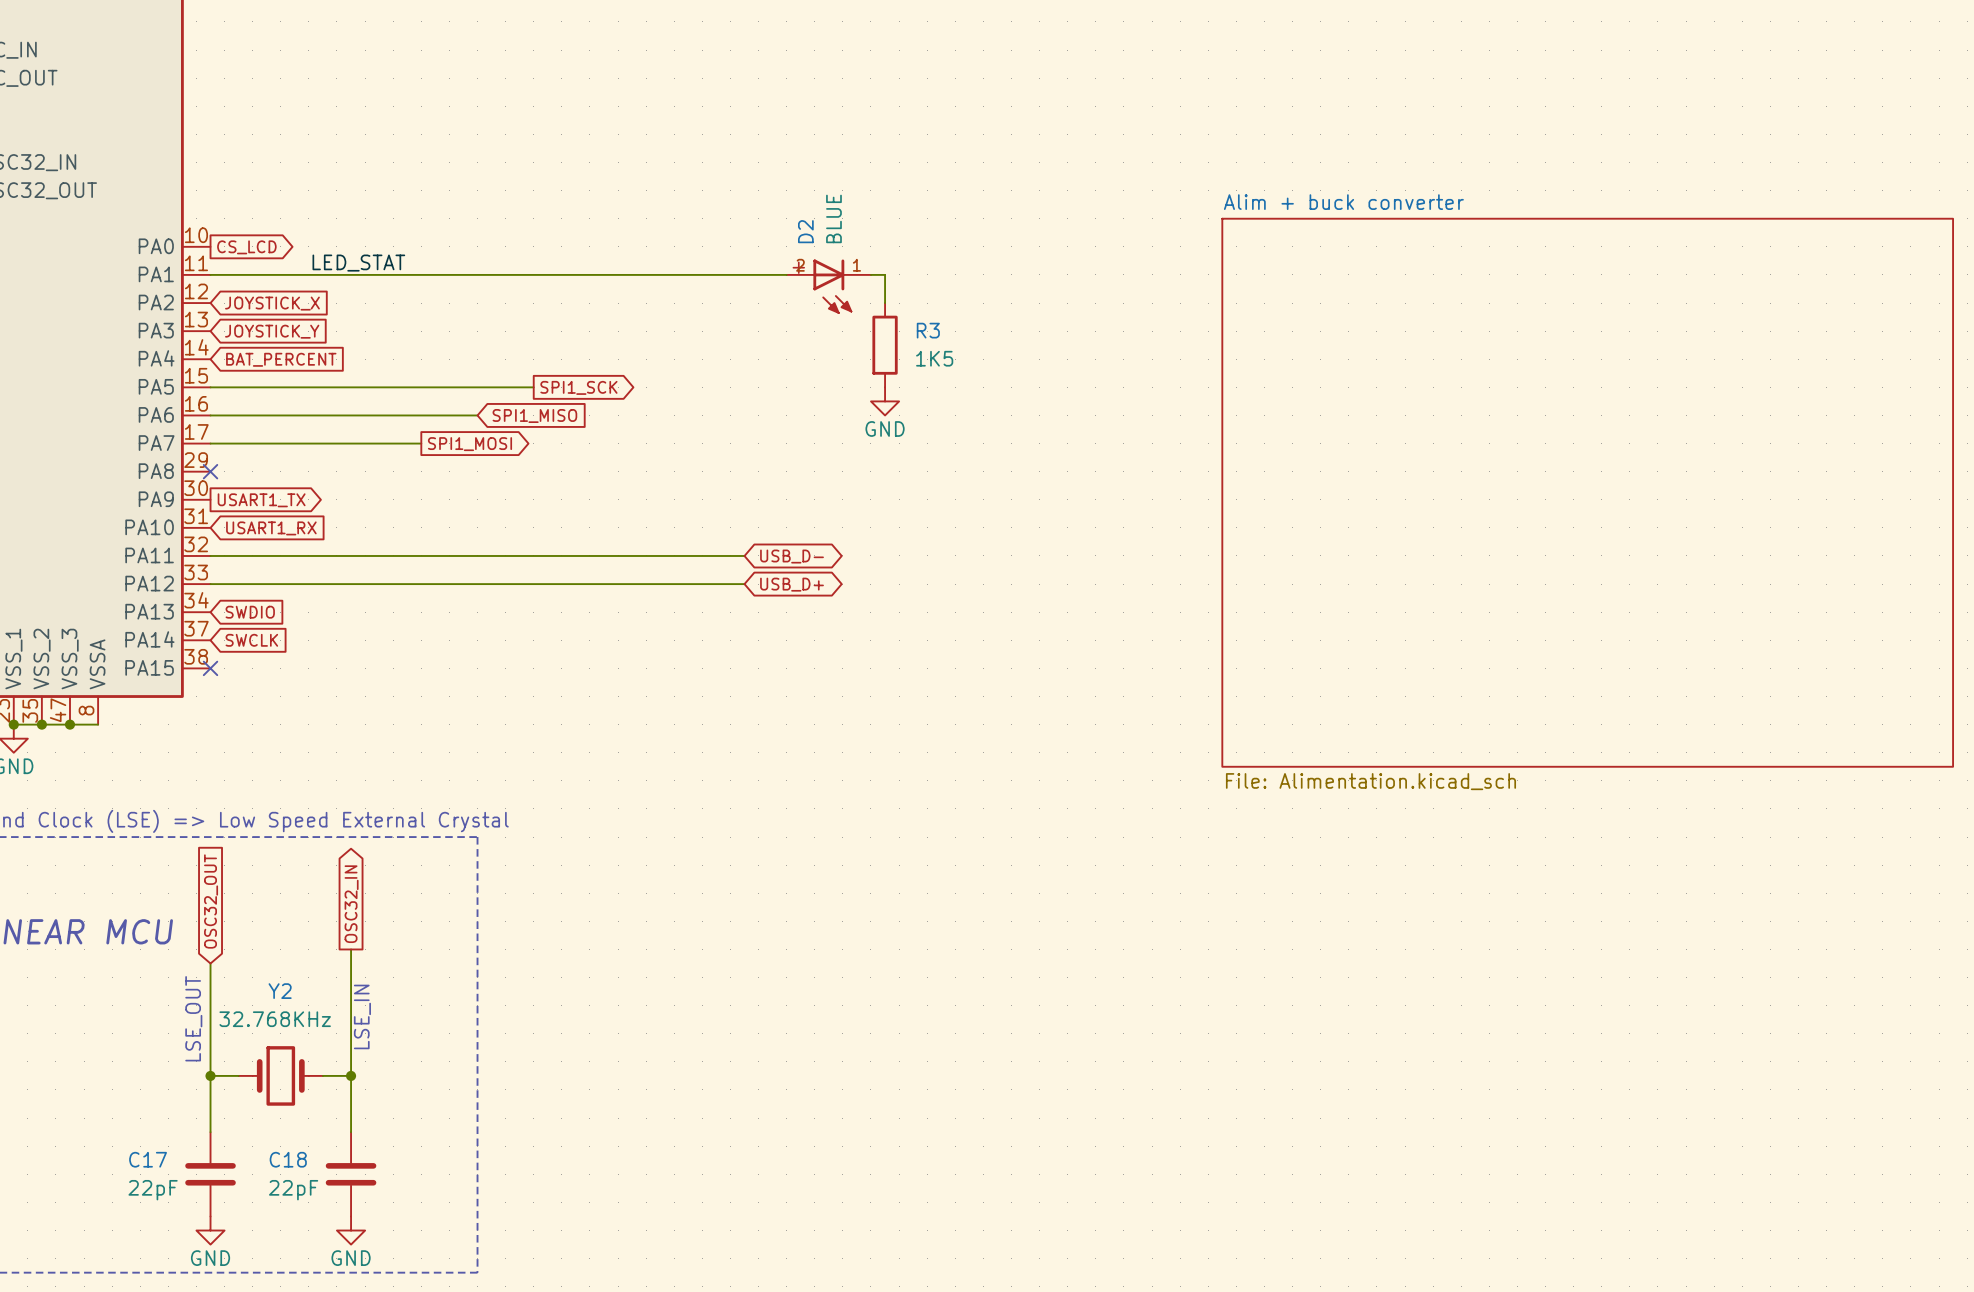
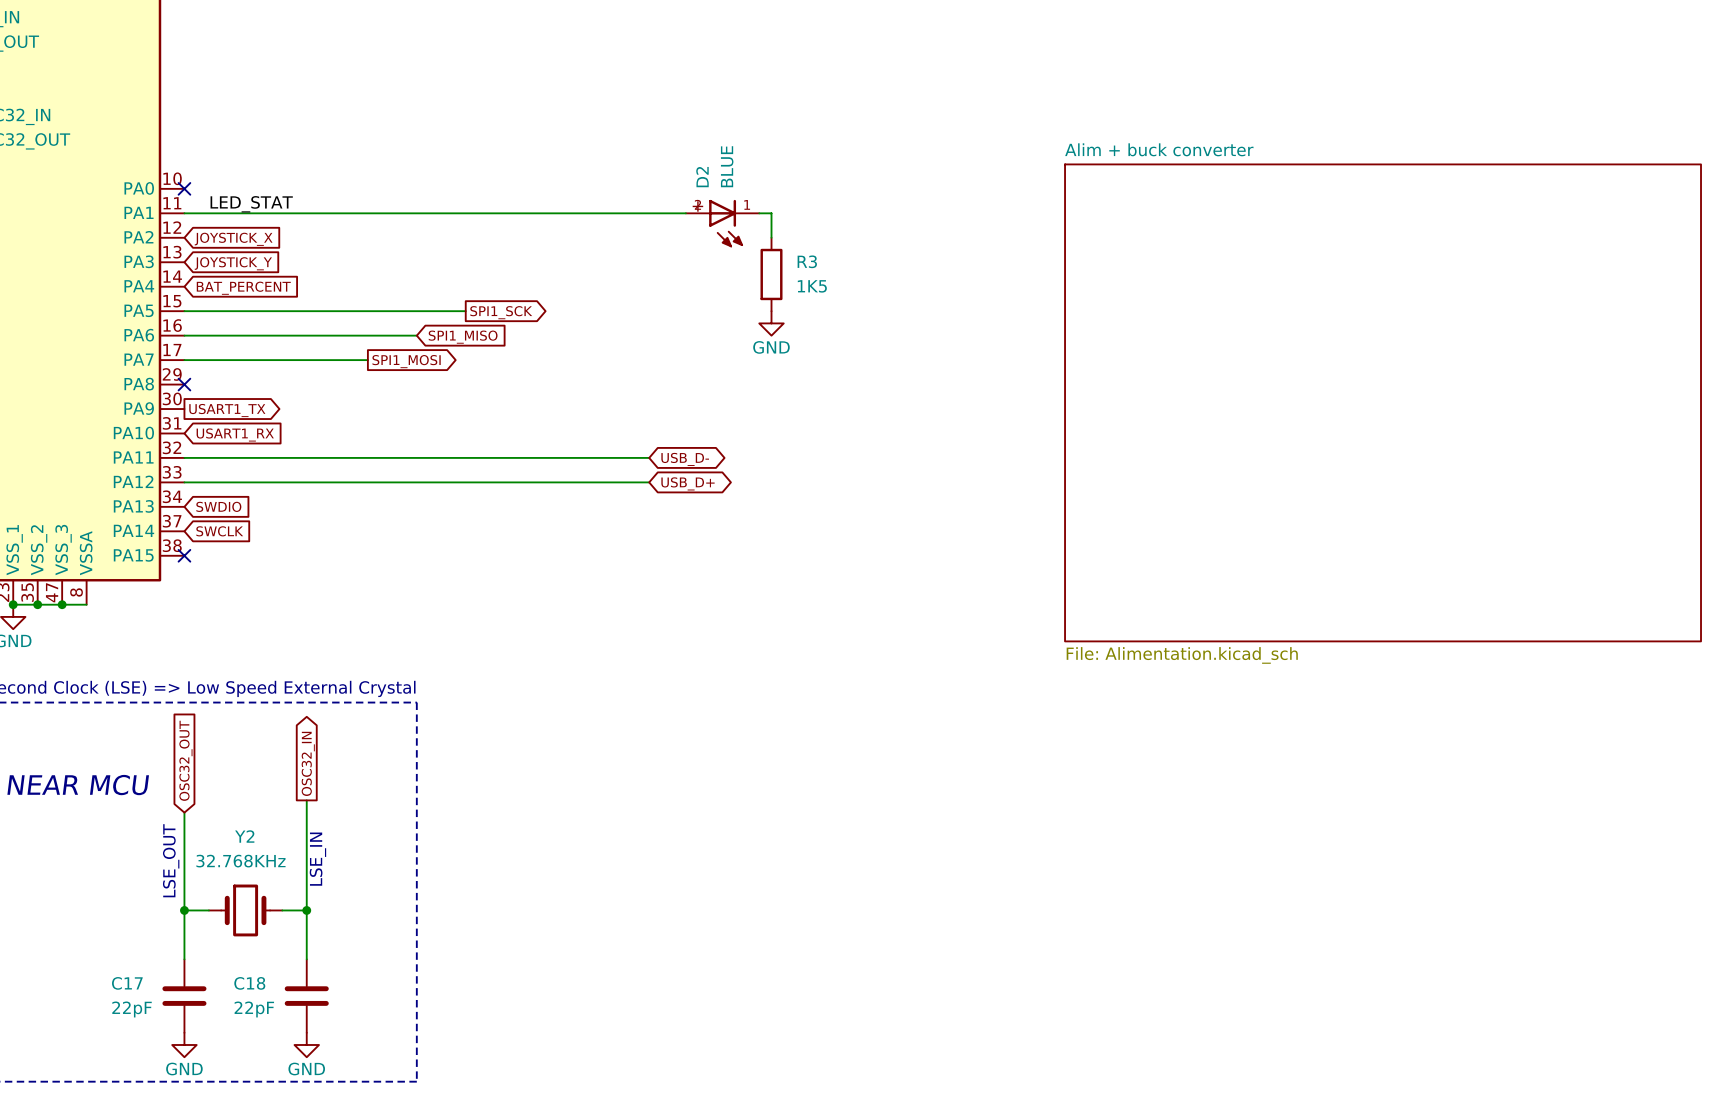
no-connect mark: none -> (184, 188)
global label: CS_LCD (246, 247) -> none
label position: LED_STAT (358, 263) -> LED_STAT (251, 204)

